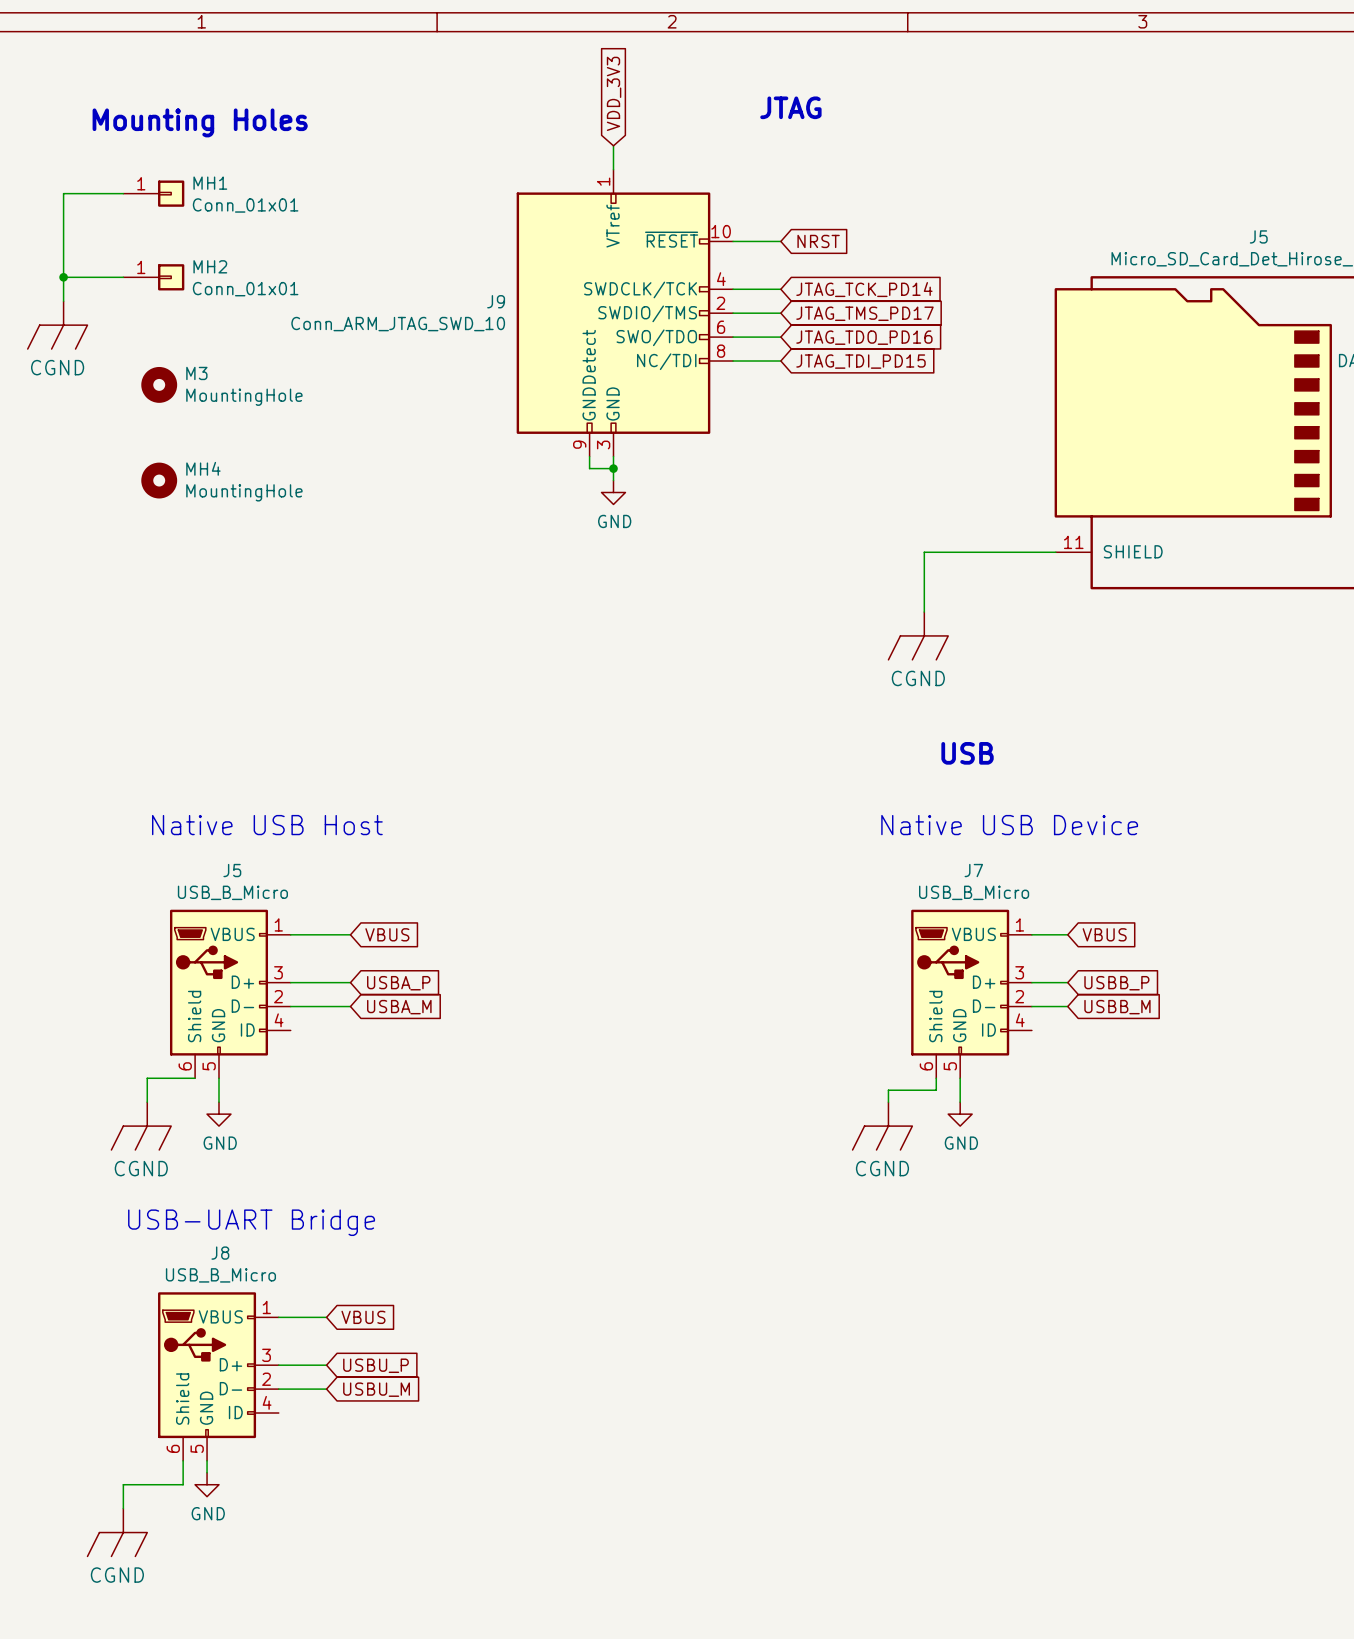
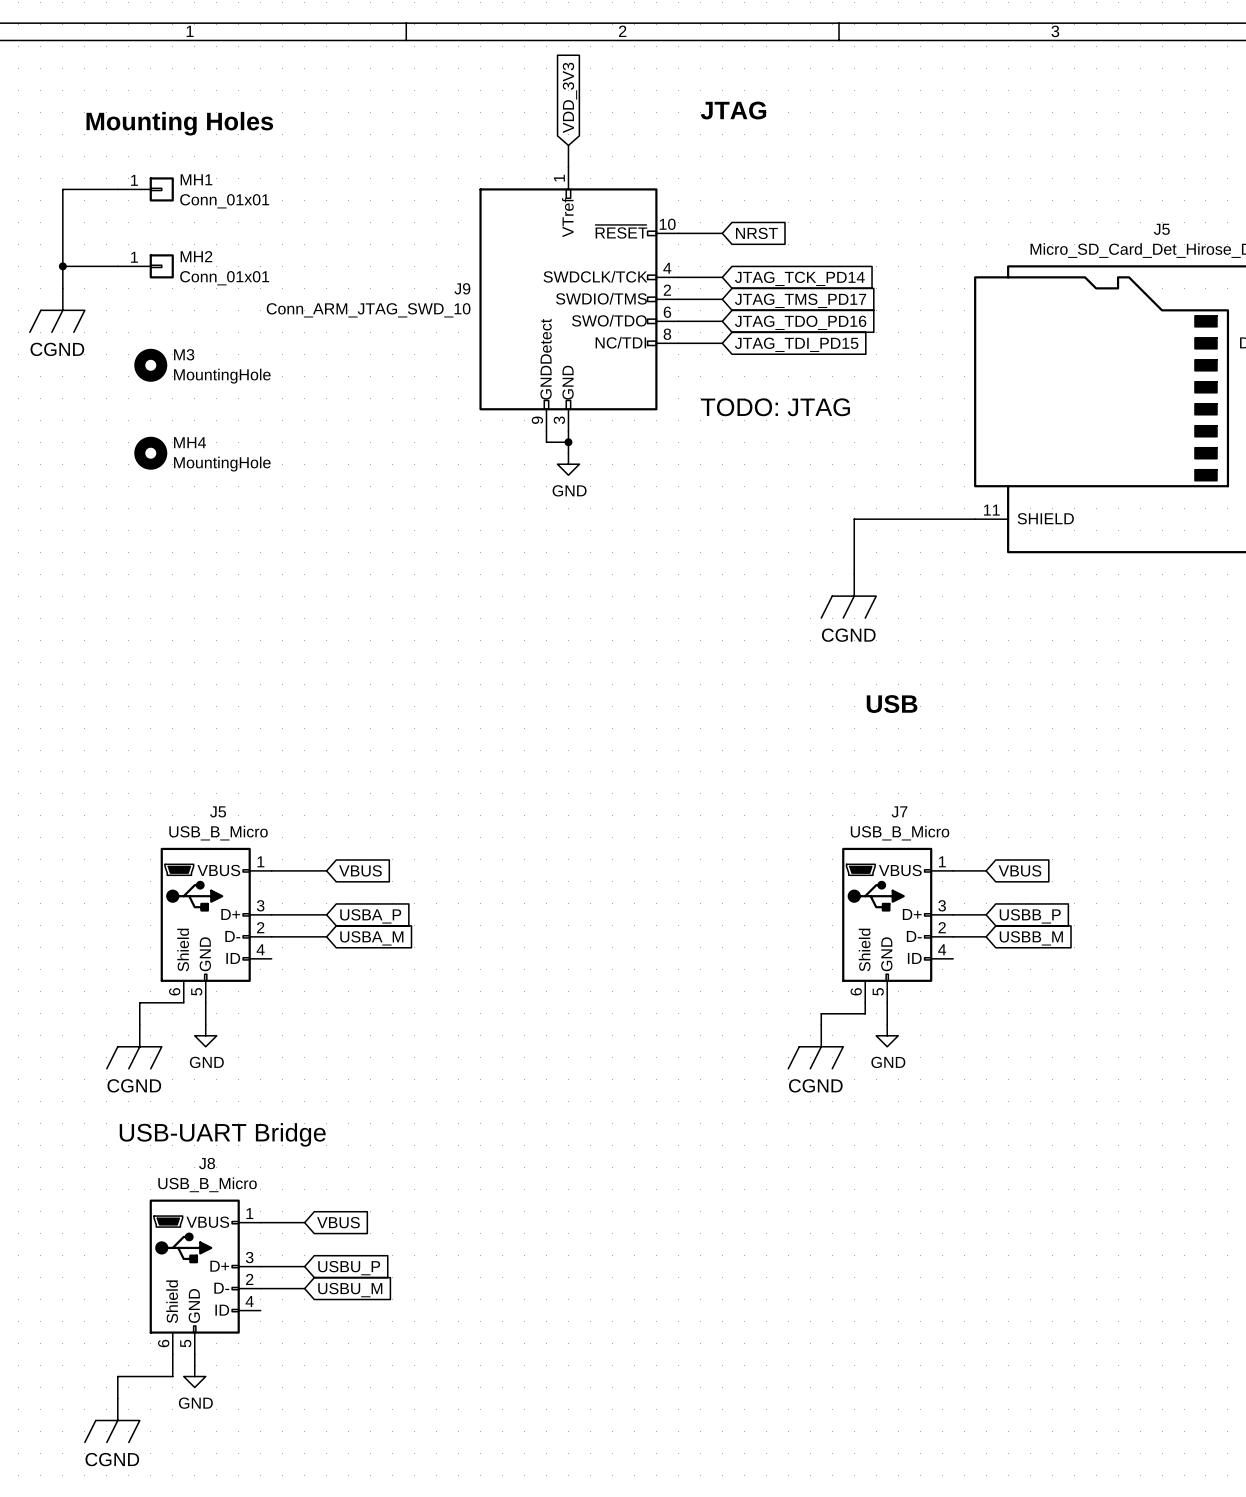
text: none -> TODO: JTAG (775, 407)
text: Native USB Host (267, 825) -> none
text: Native USB Device (1009, 825) -> none

